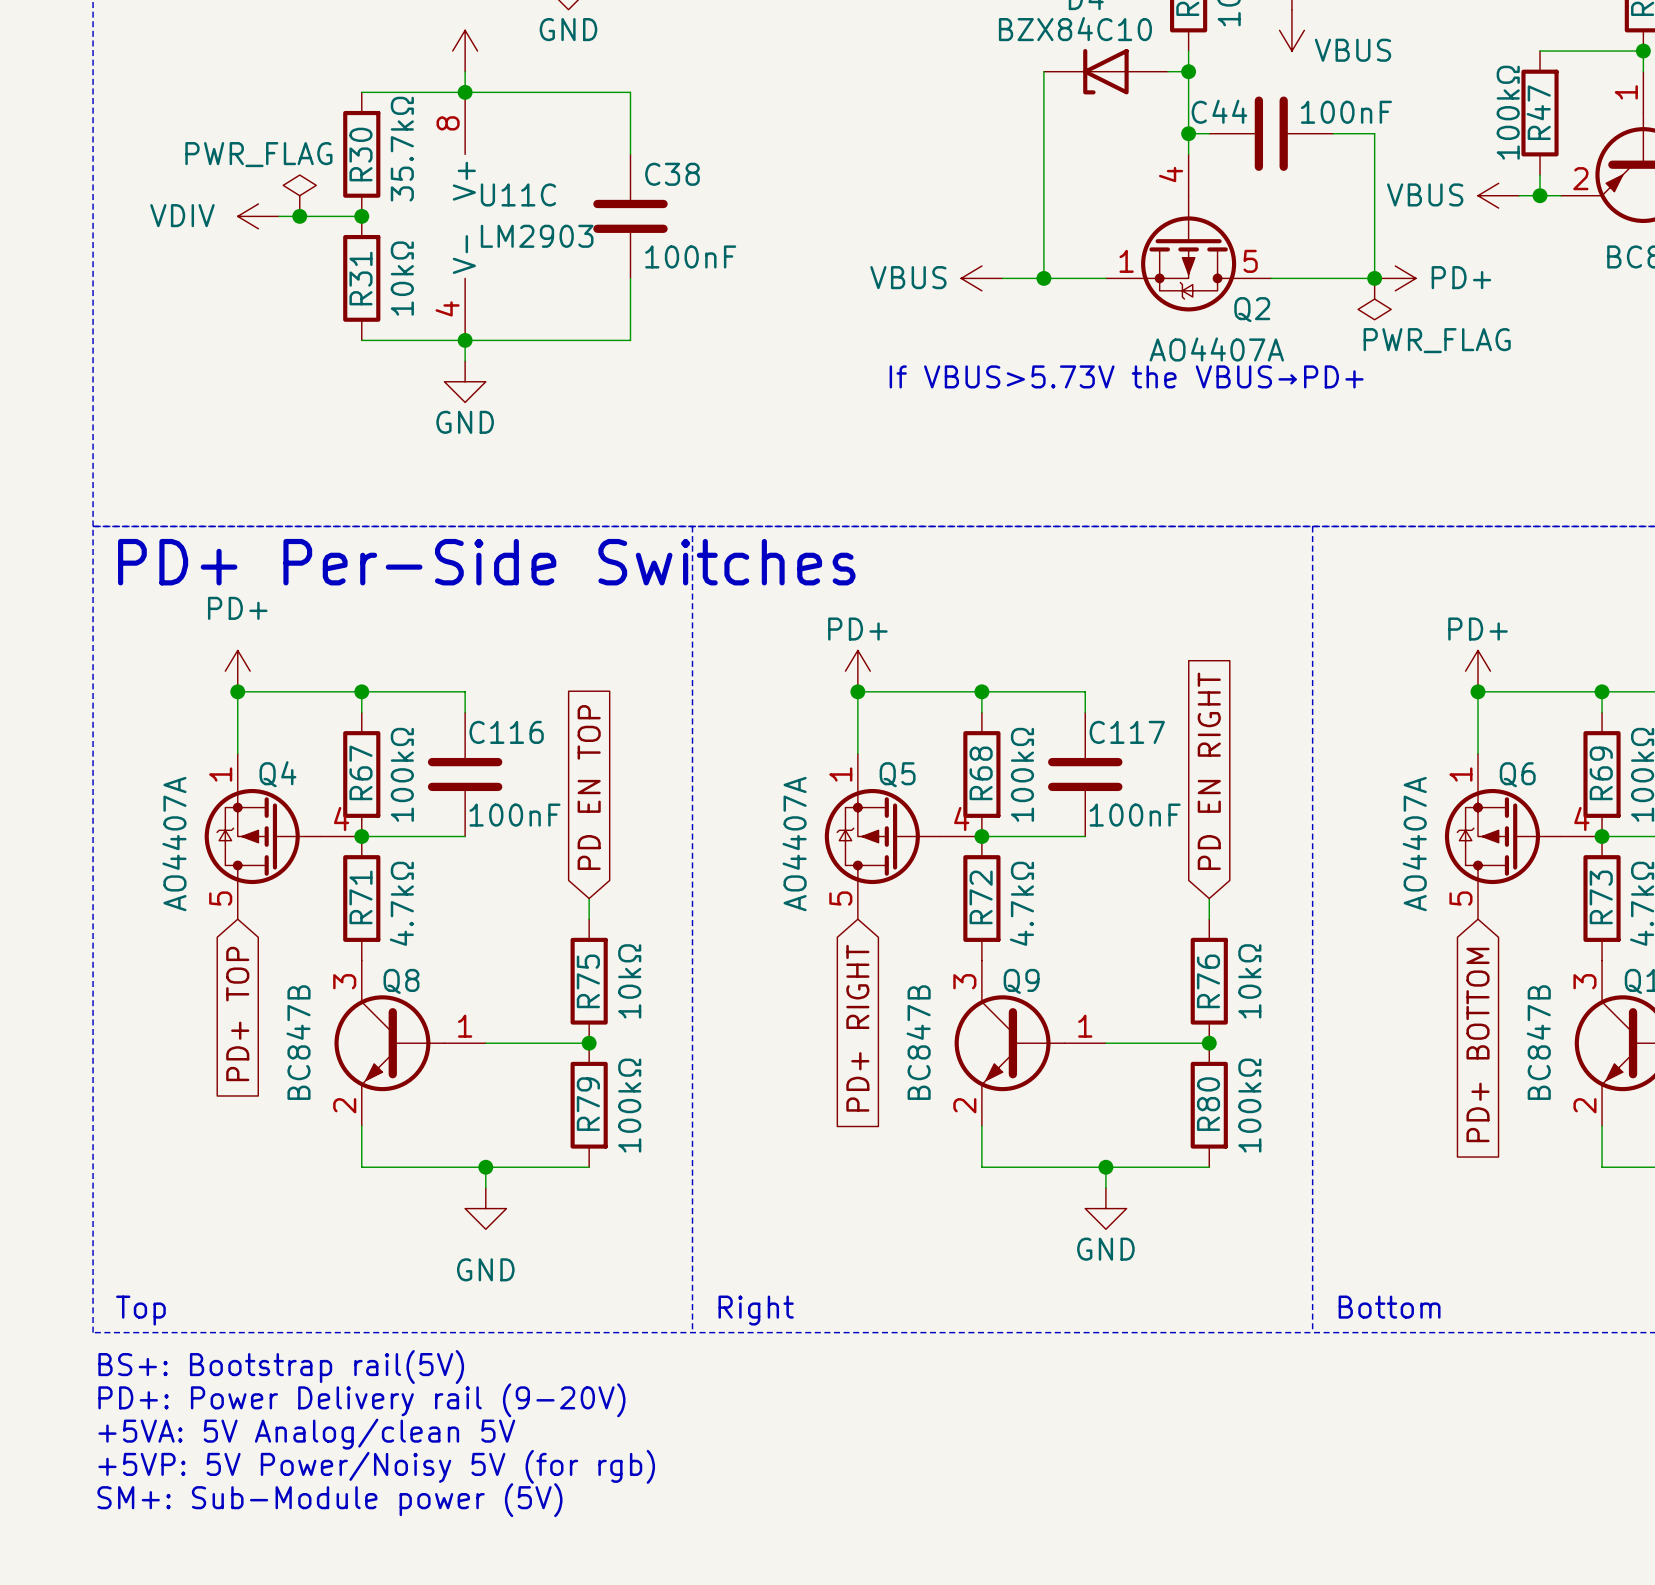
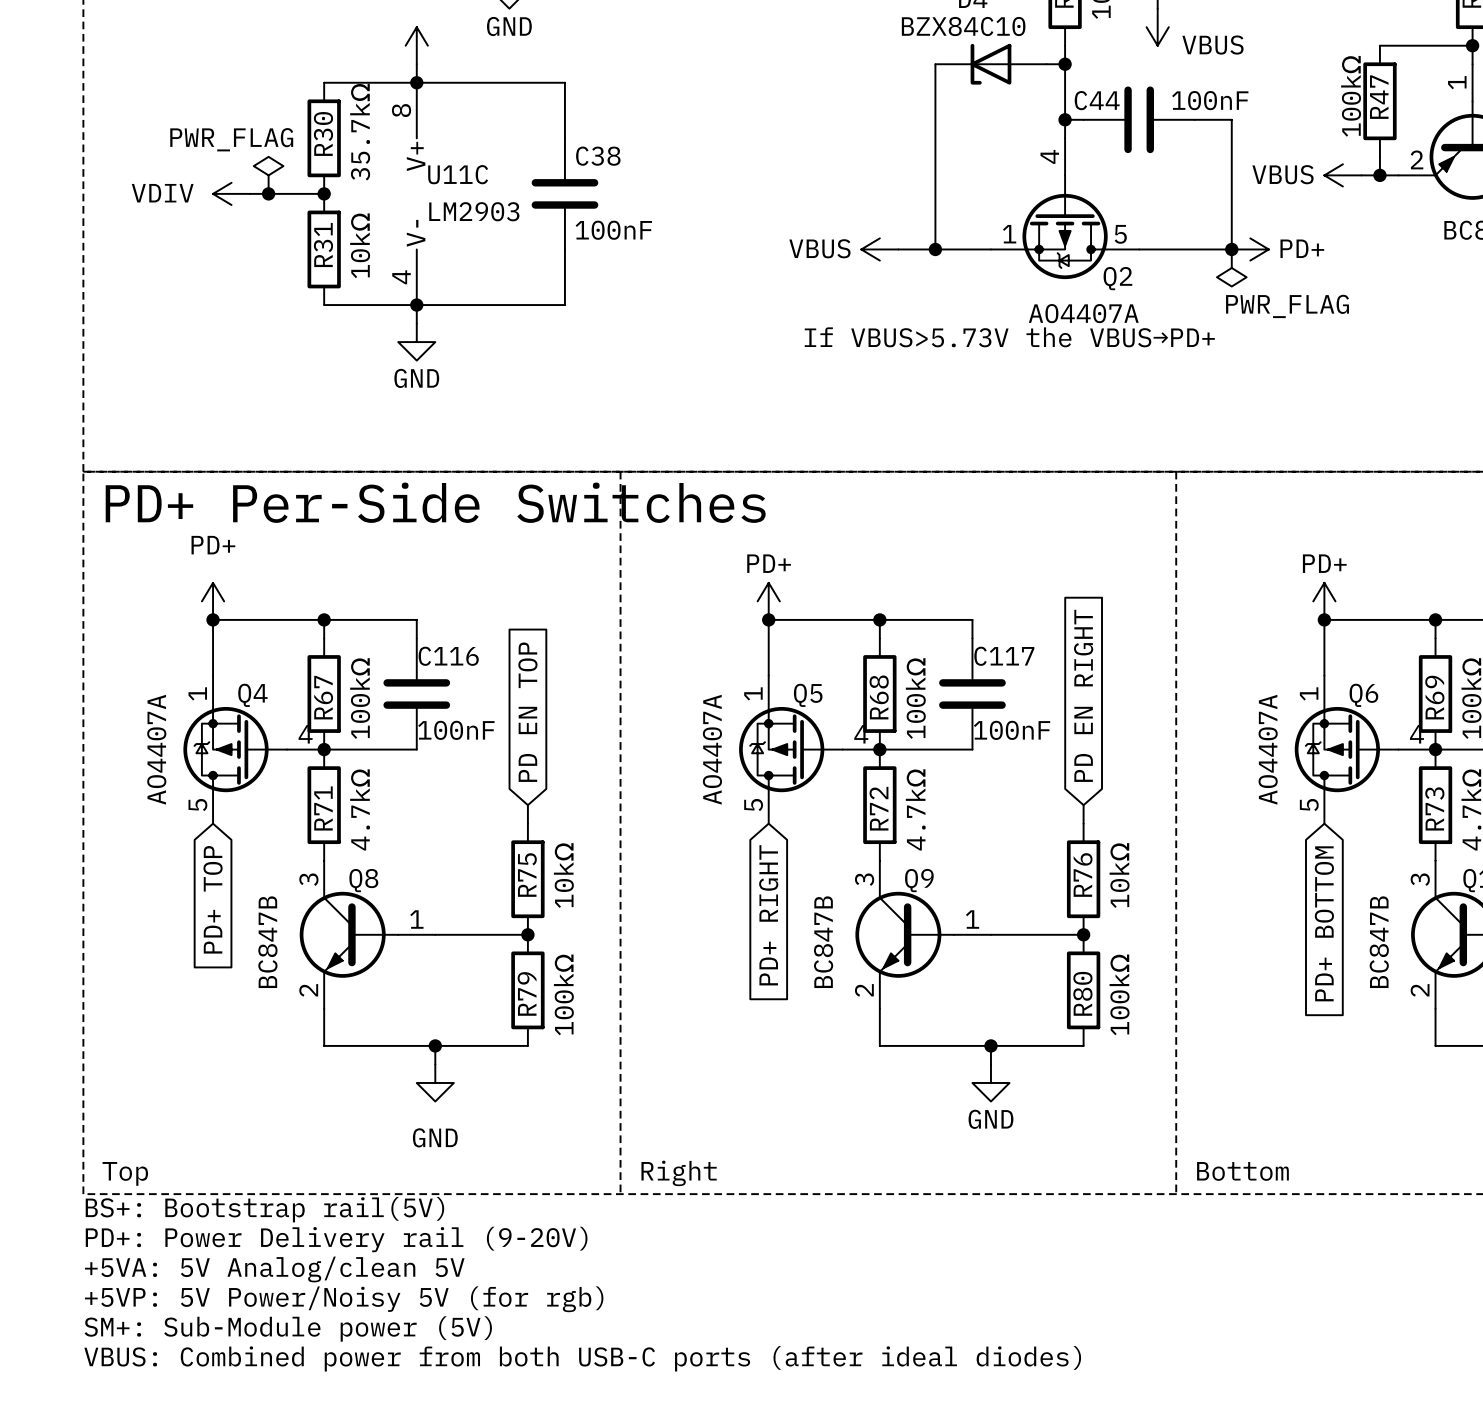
text position: BS+: Bootstrap rail(5V) (281, 1367) -> BS+: Bootstrap rail(5V) (264, 1209)
text position: PD+: Power Delivery rail (9-20V) (361, 1400) -> PD+: Power Delivery rail (9-20V) (336, 1239)
text position: +5VA: 5V Analog/clean 5V (306, 1434) -> +5VA: 5V Analog/clean 5V (274, 1269)
text position: +5VP: 5V Power/Noisy 5V (for rgb) (376, 1466) -> +5VP: 5V Power/Noisy 5V (for rgb) (344, 1299)
text position: SM+: Sub-Module power (5V) (329, 1500) -> SM+: Sub-Module power (5V) (288, 1328)
text: none -> VBUS: Combined power from both USB-C ports (after ideal diodes) (582, 1358)

